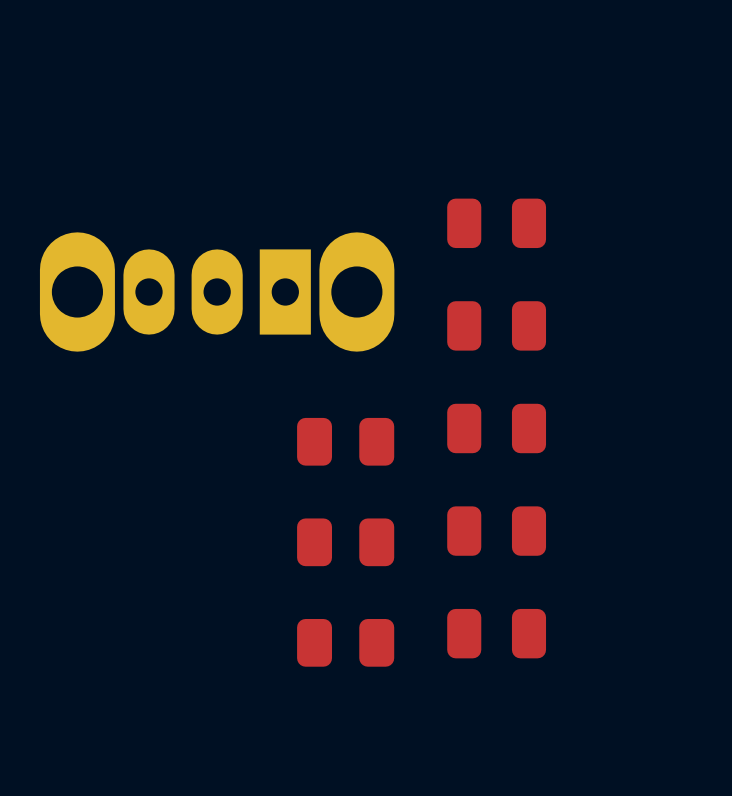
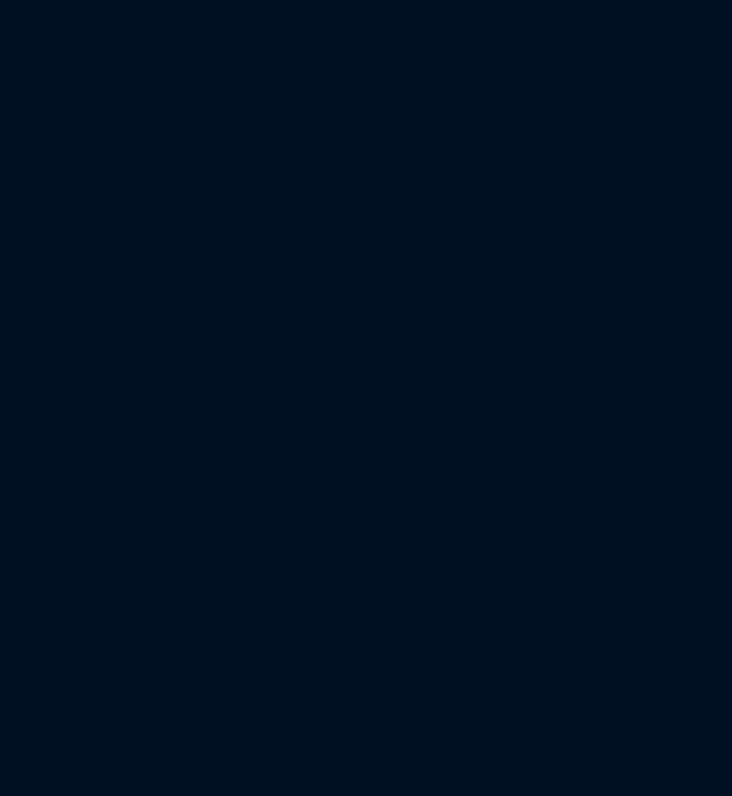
part: (496, 223) -> none
part: (217, 292) -> none
part: (496, 325) -> none
part: (496, 428) -> none
part: (345, 441) -> none
part: (496, 531) -> none
part: (345, 542) -> none
part: (496, 633) -> none
part: (345, 642) -> none

